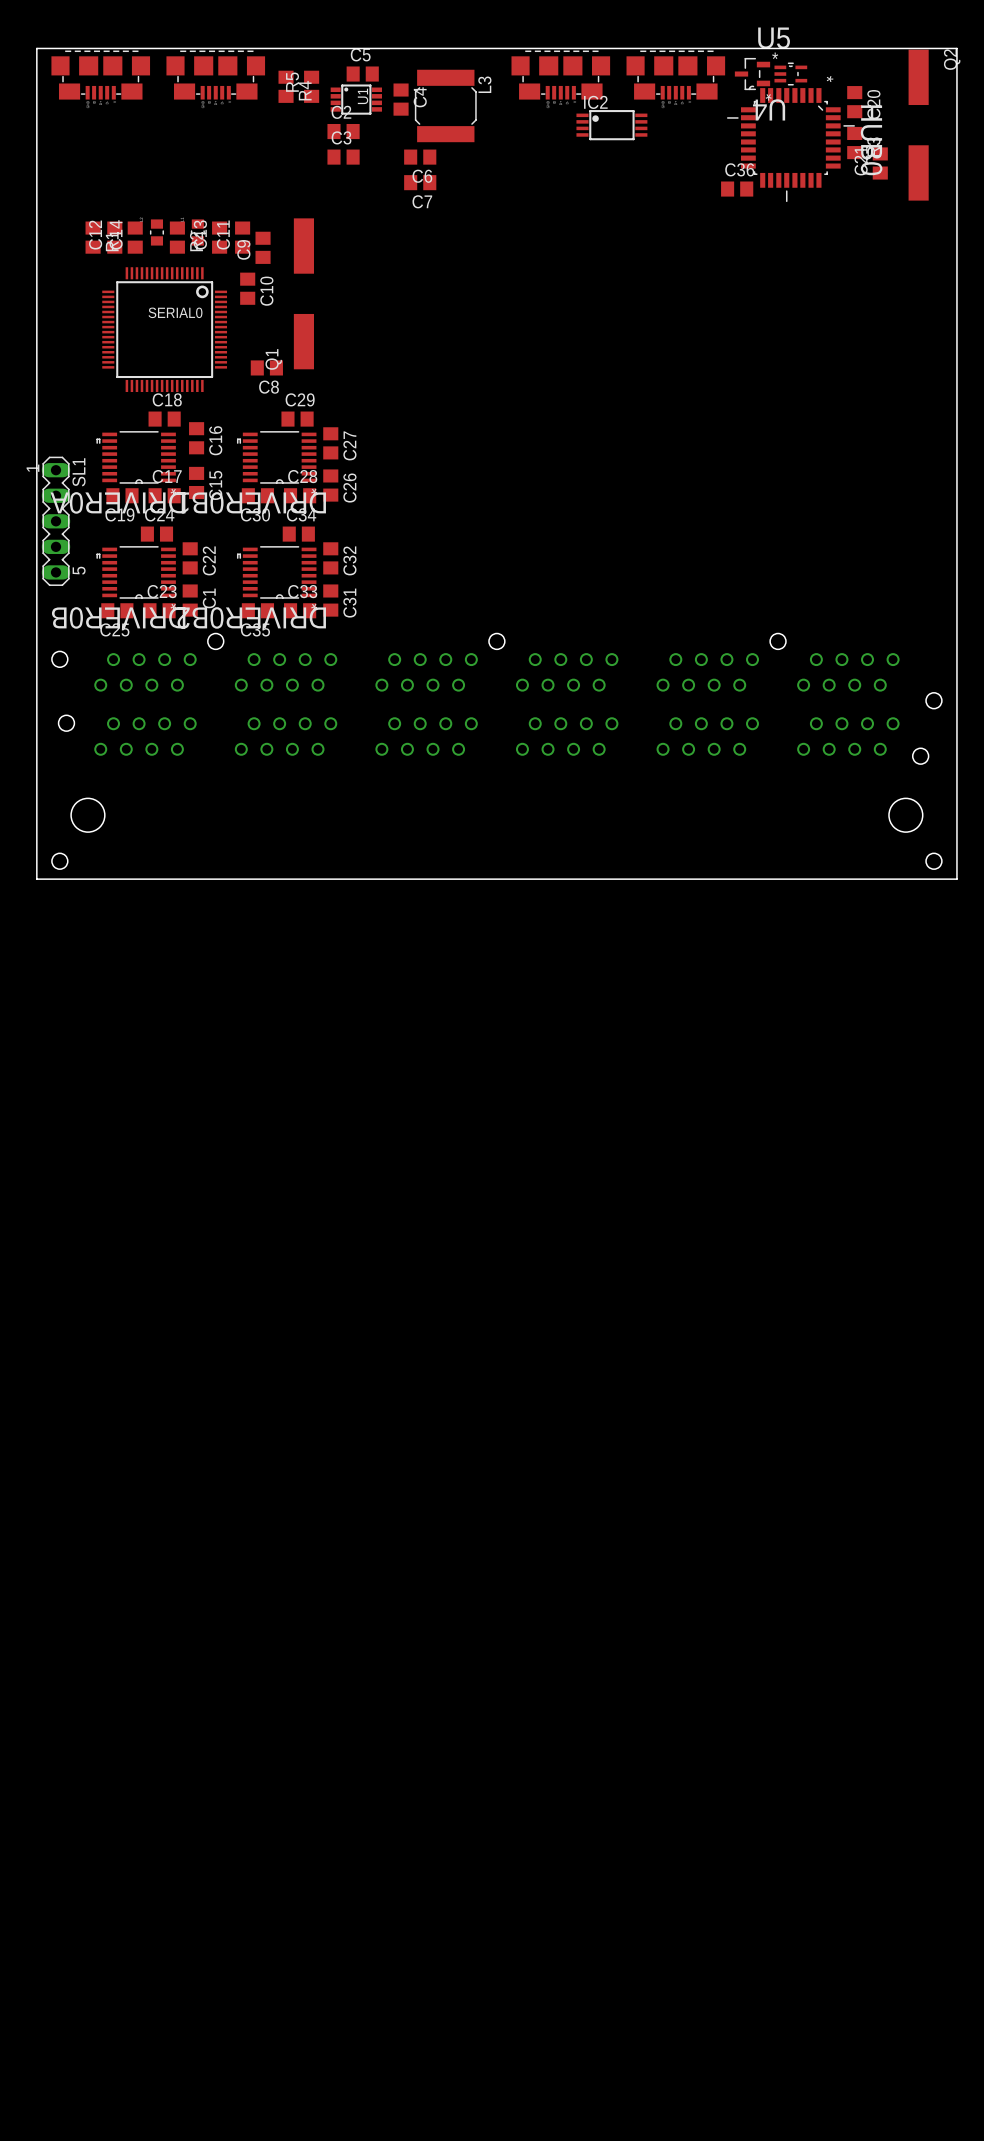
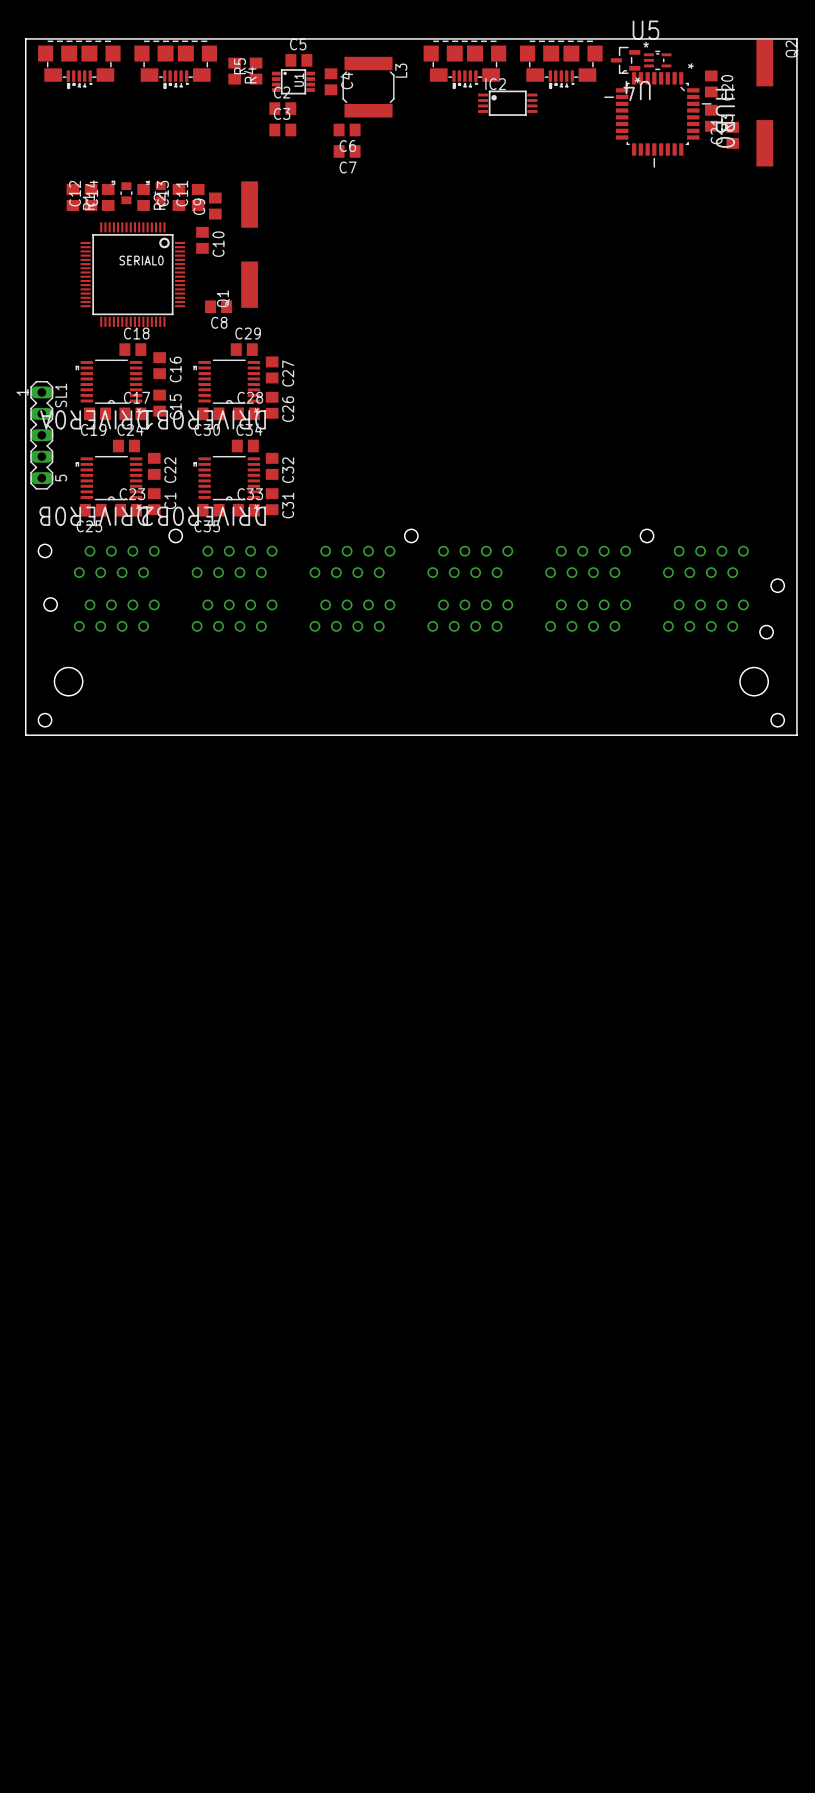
C36: (737, 189) -> none

